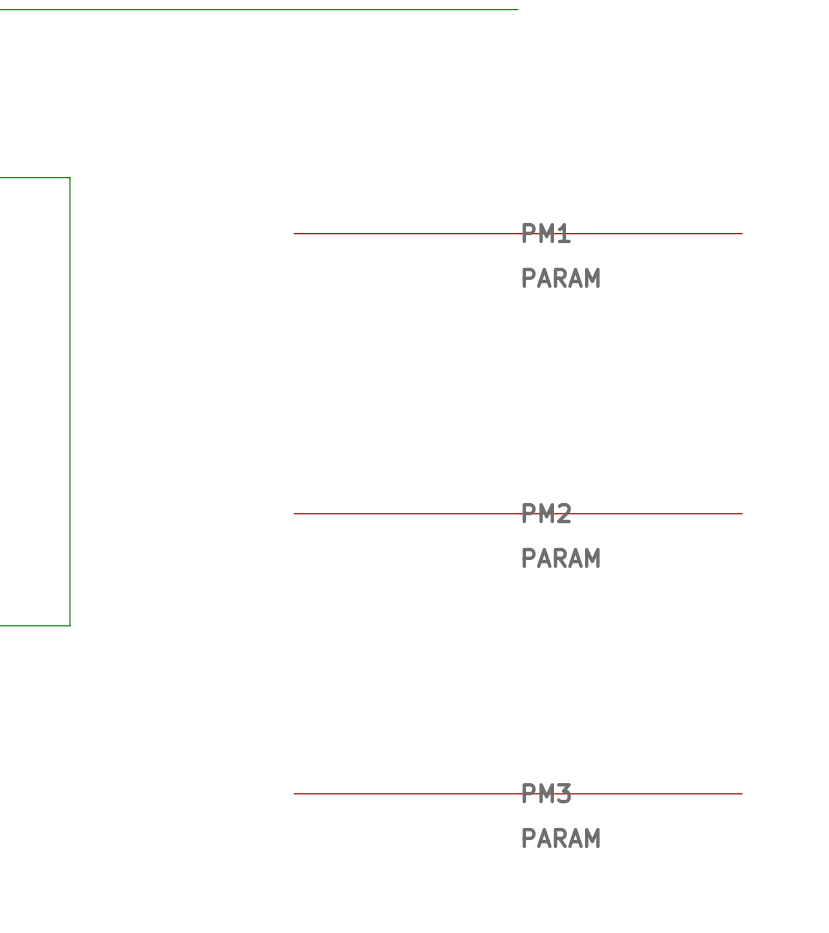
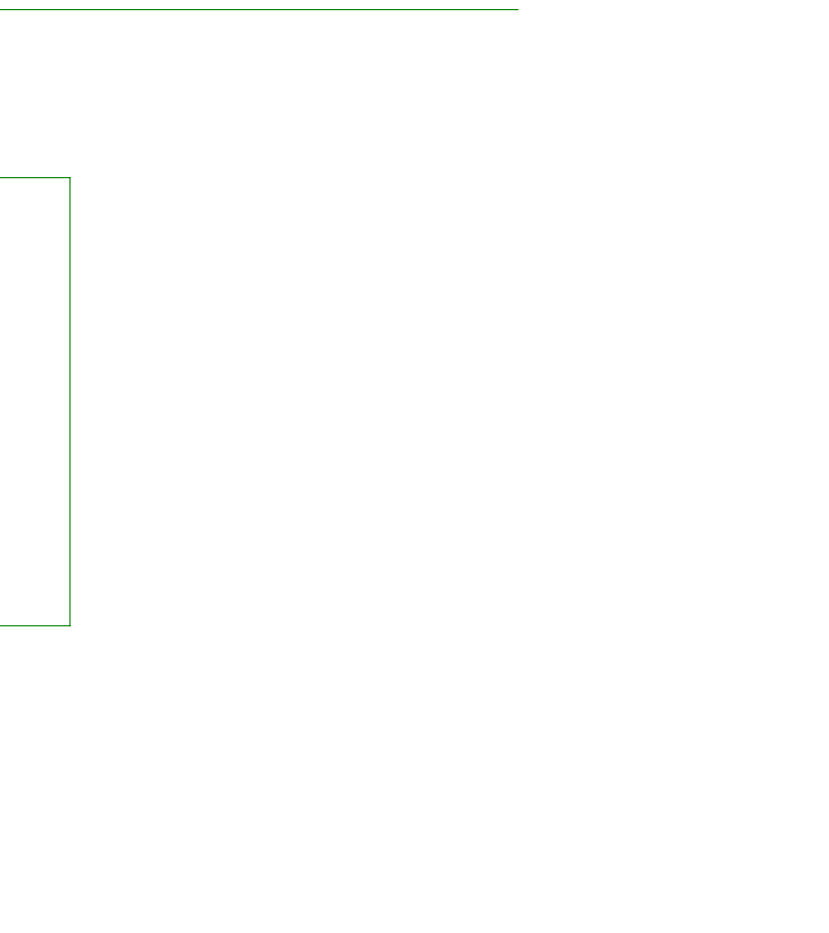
PM1: PARAM (518, 233) -> none
PM2: PARAM (518, 513) -> none
PM3: PARAM (518, 793) -> none

